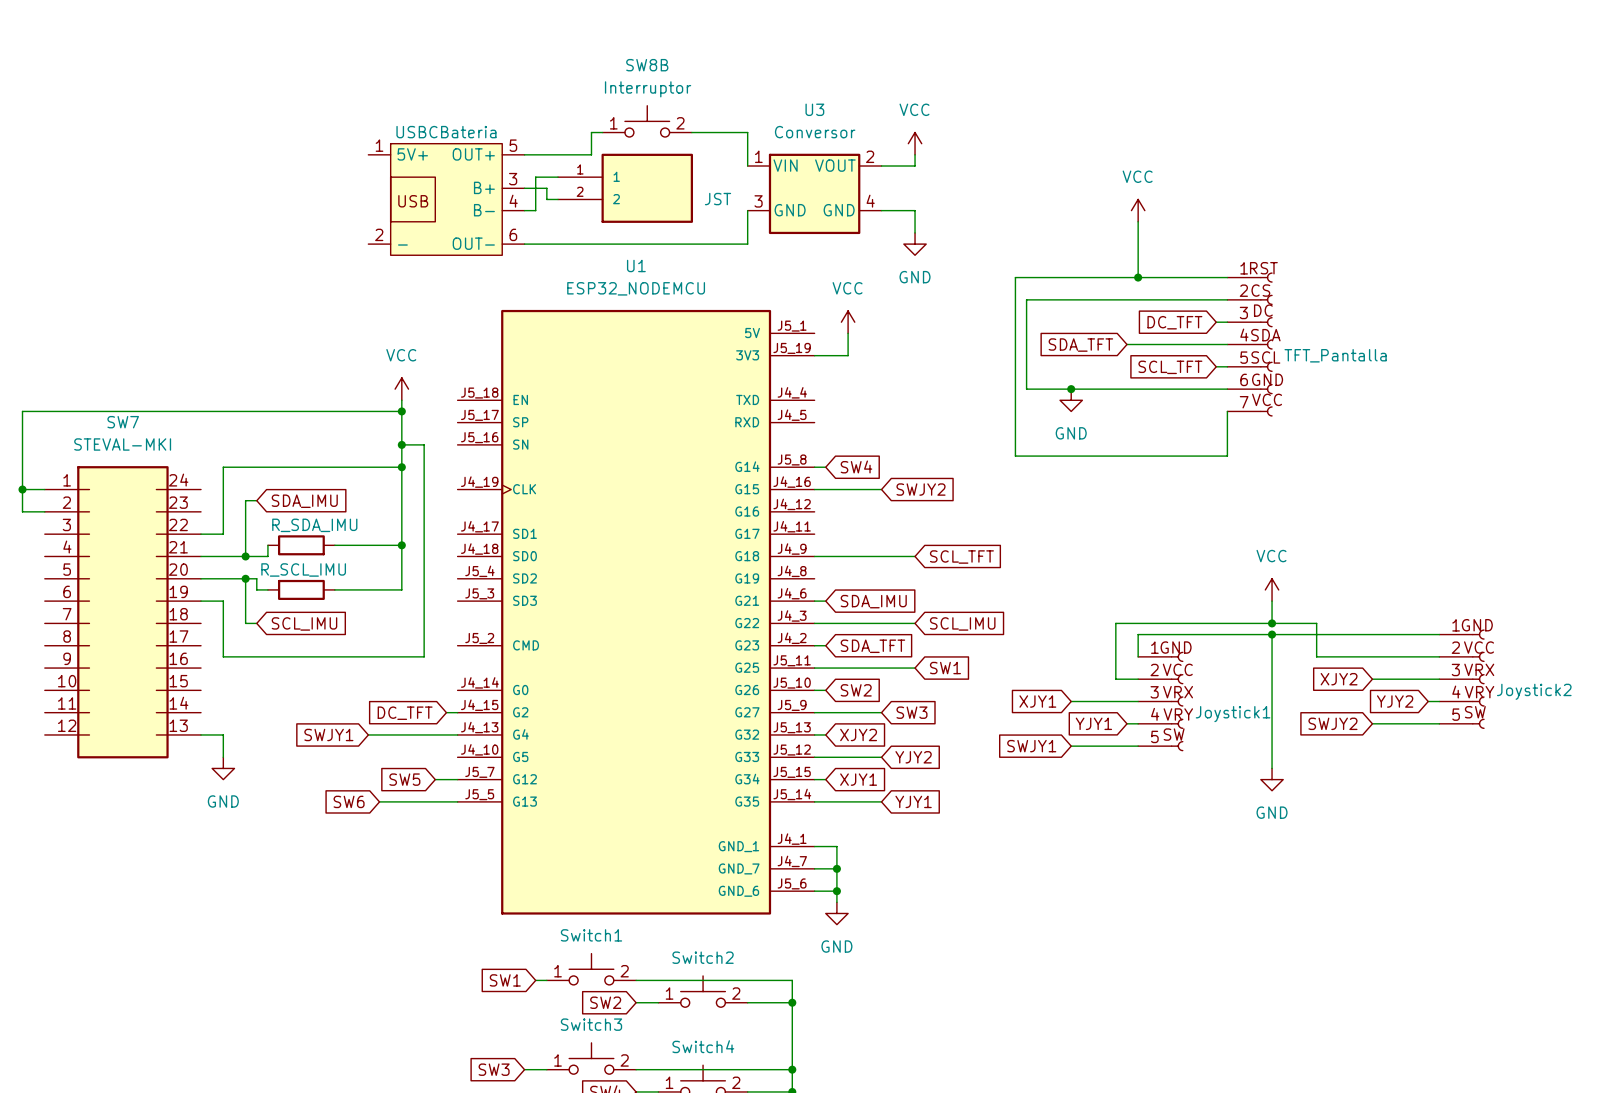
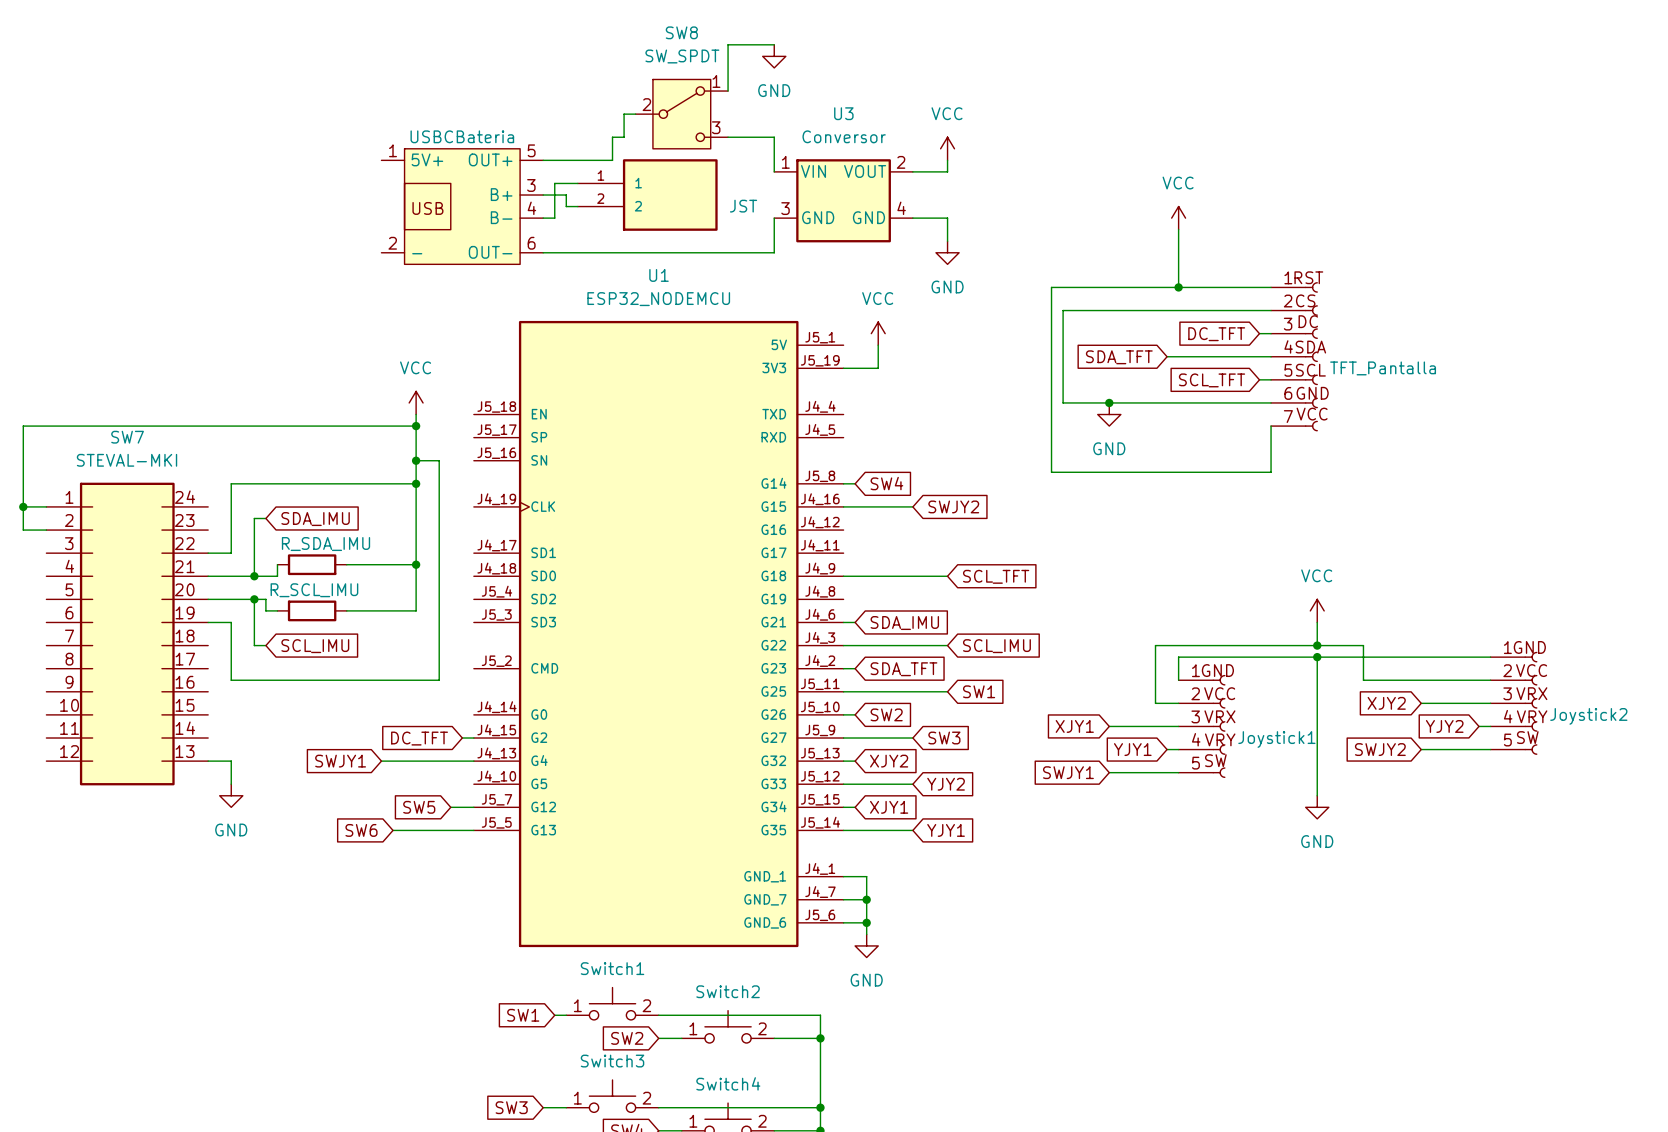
wire: none -> (774, 44) (728, 44) (728, 91)
power symbol: none -> GND (774, 56)
wire: none -> (635, 114) (624, 114) (624, 137)
SW8: none -> SW_SPDT (681, 114)
SW8B: Interruptor (647, 121) -> none

